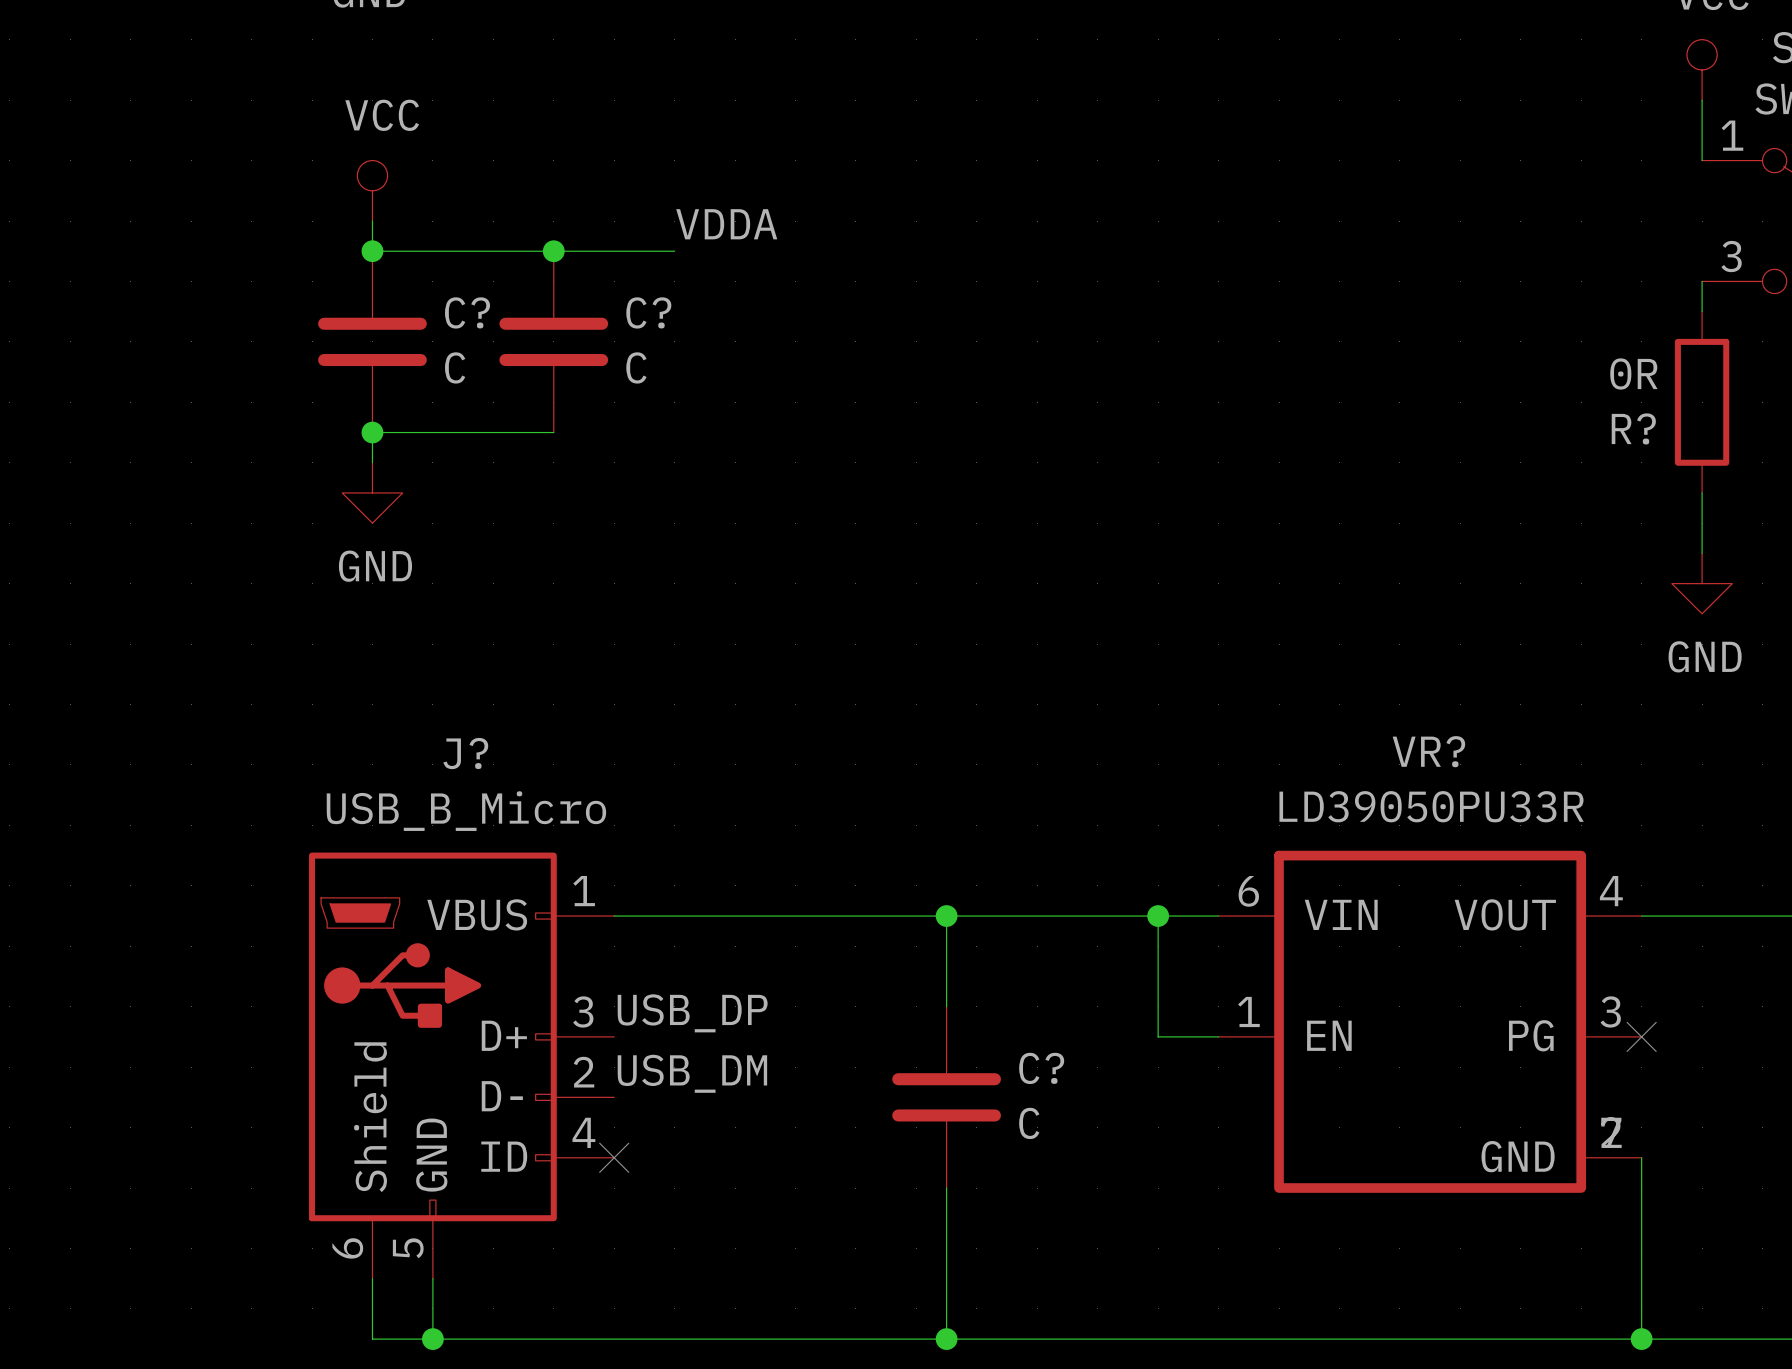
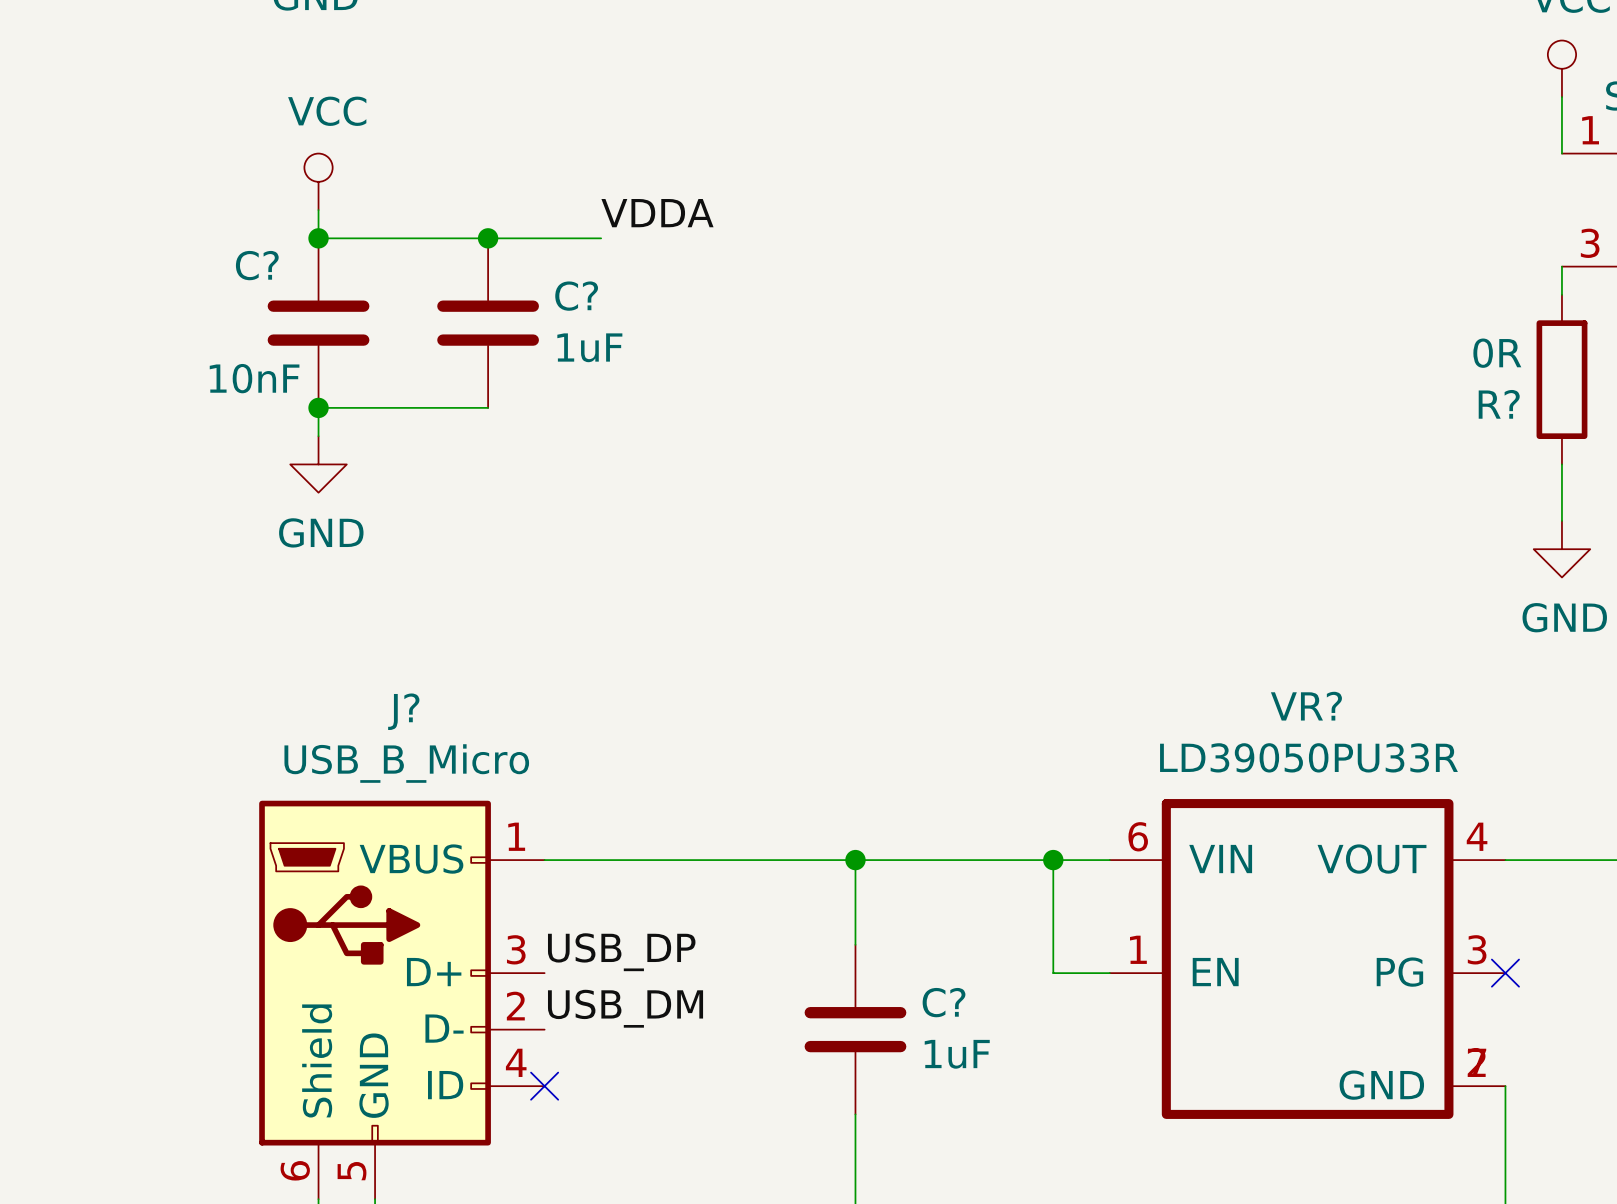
C? name position: C? (467, 312) -> C? (257, 265)
C? value: C (455, 367) -> 10nF (254, 378)
C? value: C (636, 367) -> 1uF (589, 347)
C? value: C (1029, 1123) -> 1uF (957, 1054)

